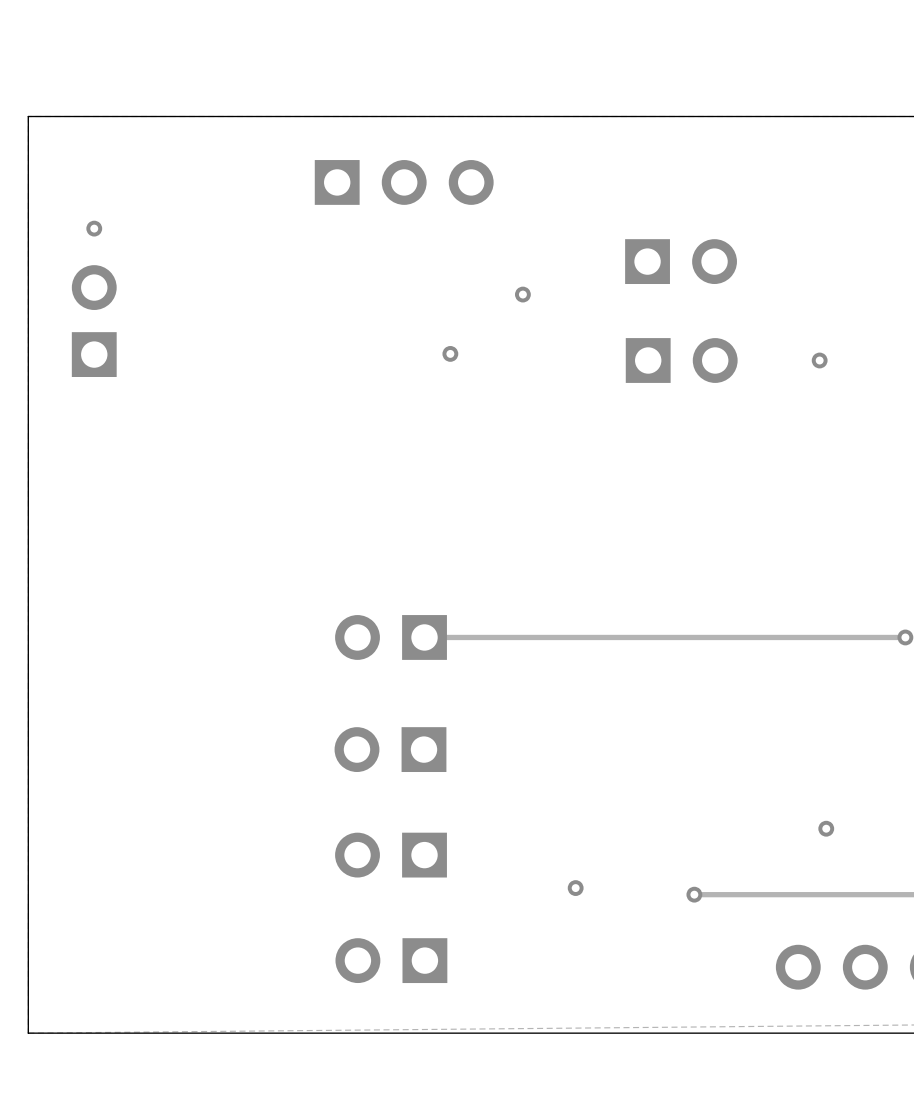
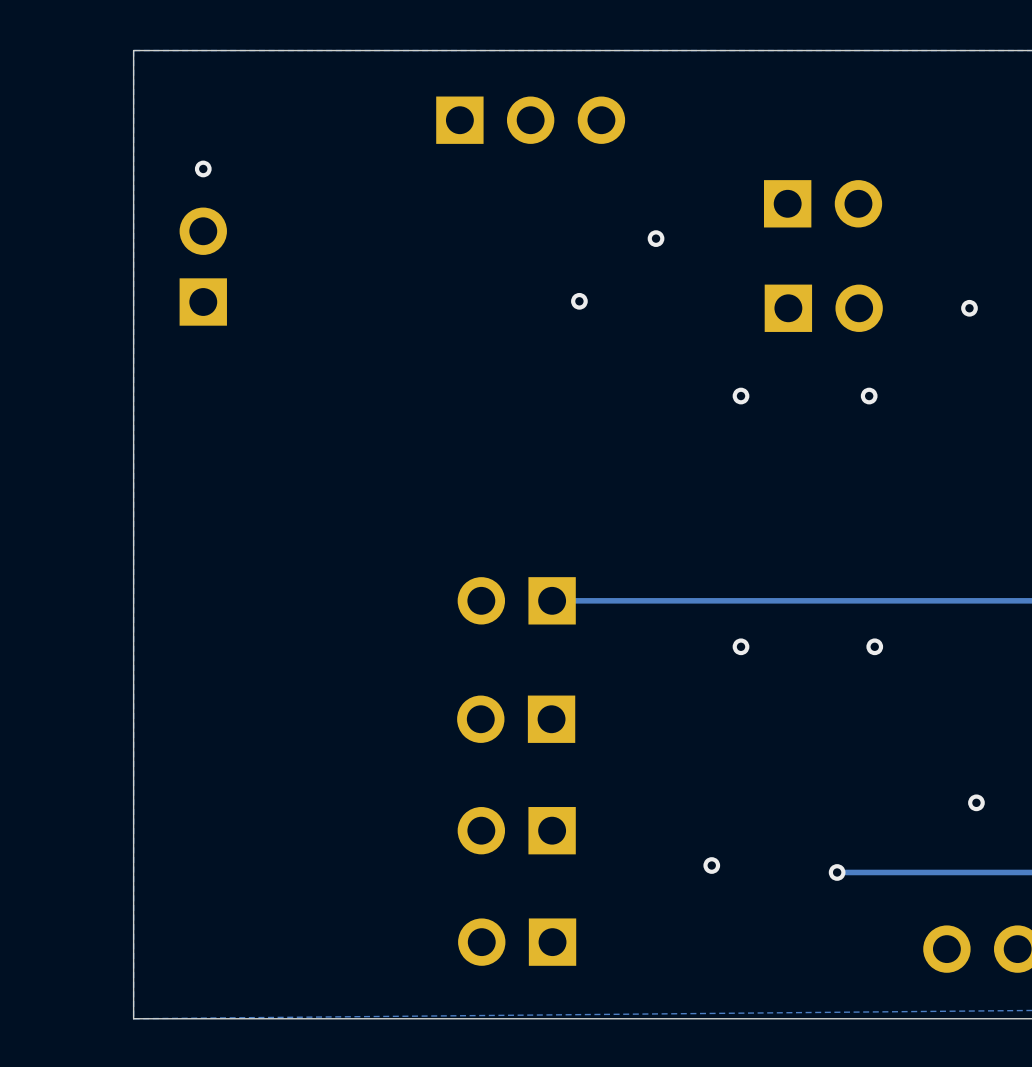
via: none -> (741, 396)
via: none -> (869, 396)
via: none -> (741, 646)
via: none -> (874, 646)

